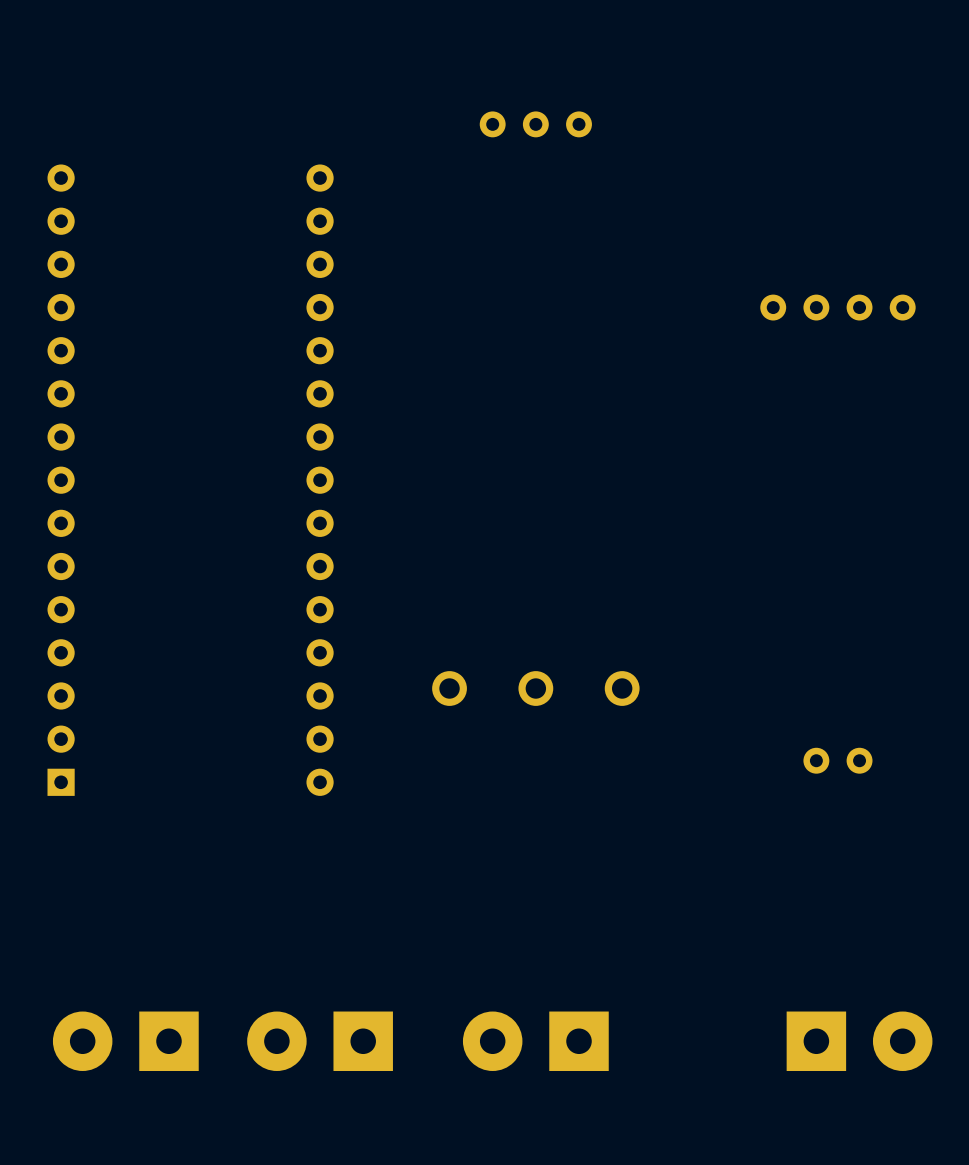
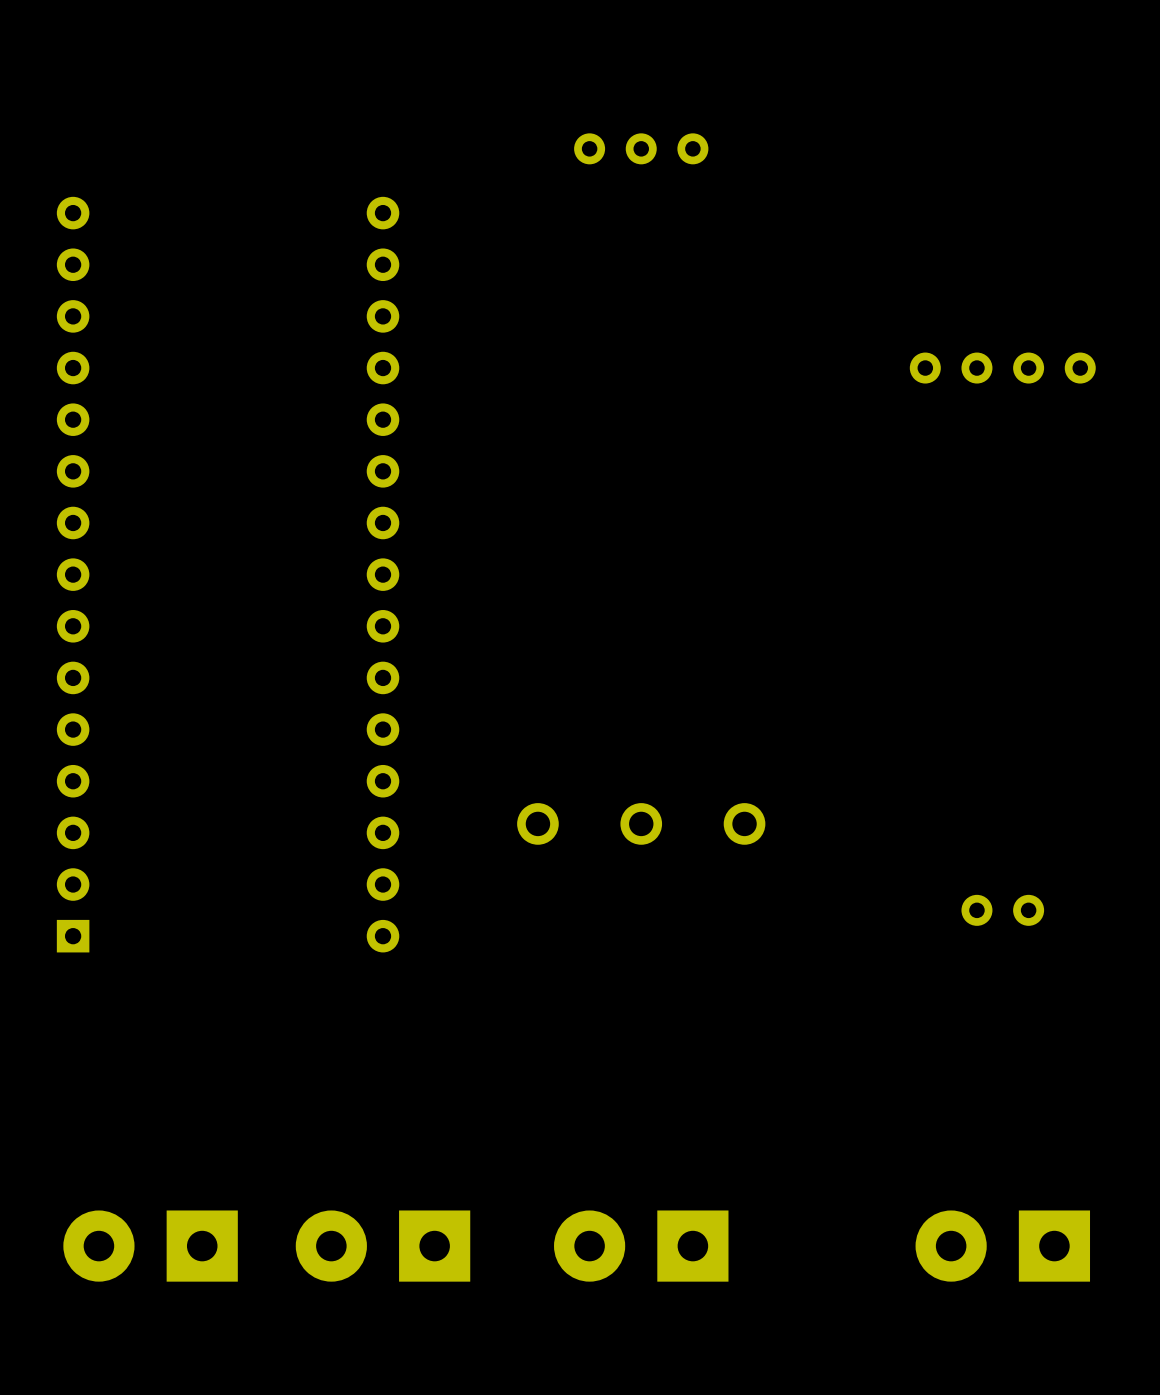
part rotation: 0° (859, 1041) -> 180° (1002, 1246)

